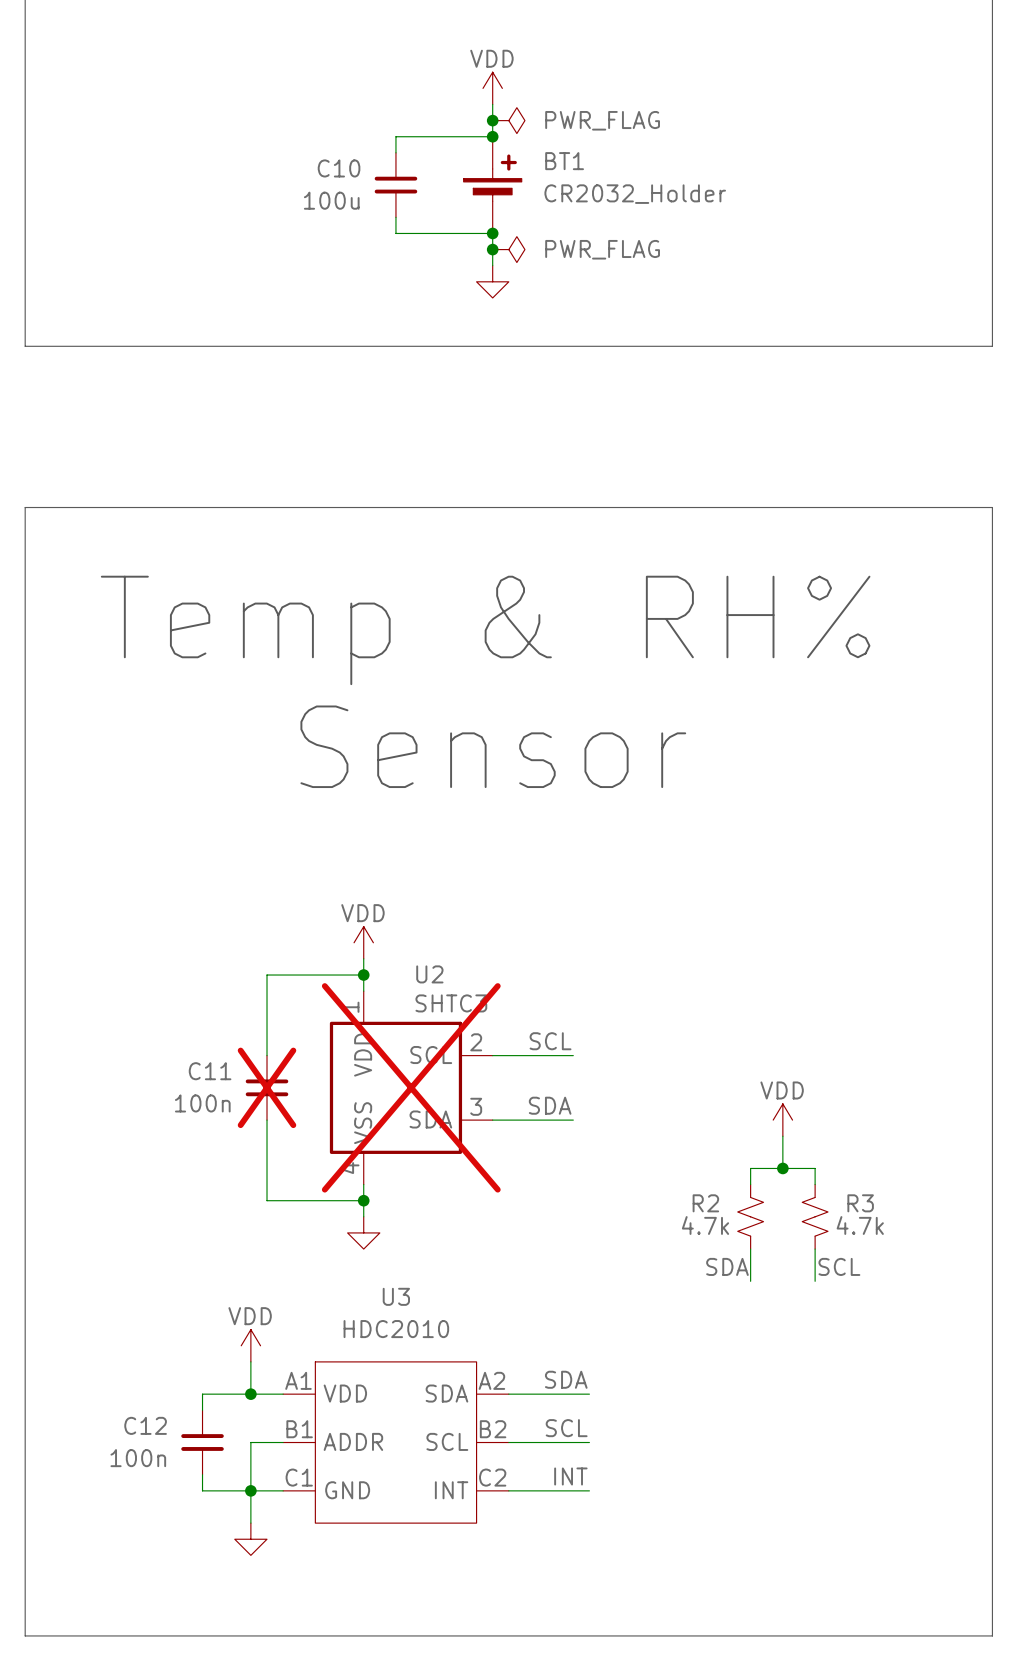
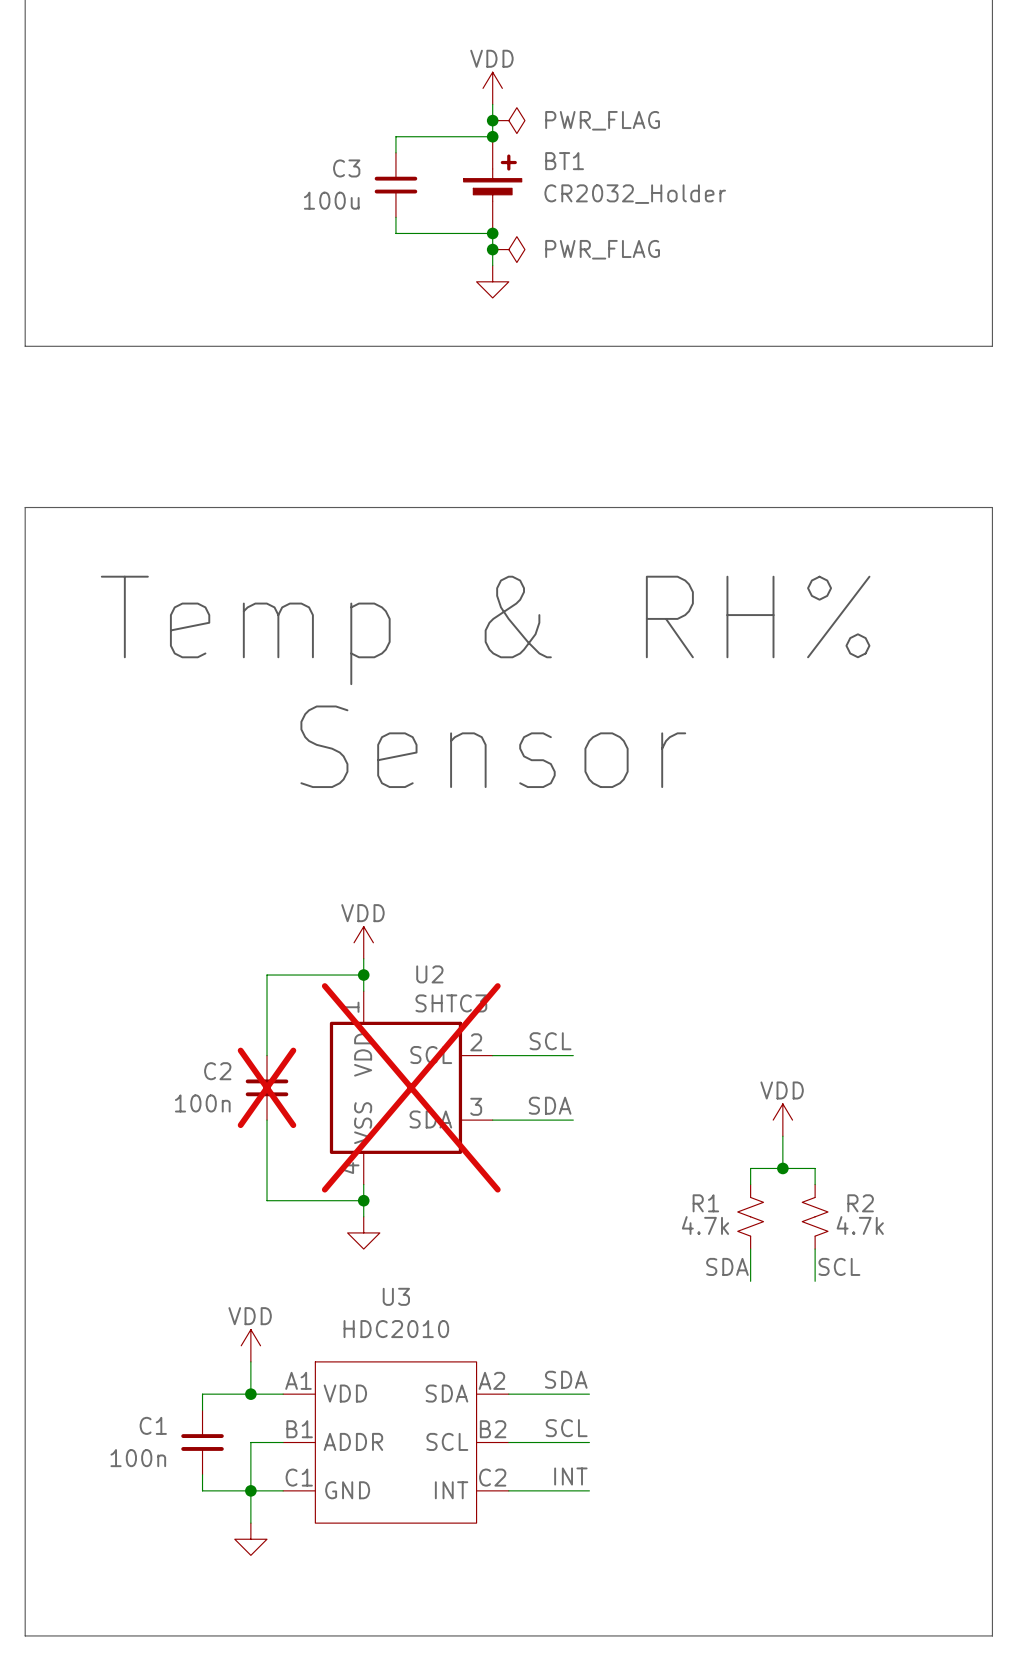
C10 name: C10 (339, 168) -> C3 (346, 168)
C11 name: C11 (210, 1071) -> C2 (217, 1071)
R2 name: R2 (705, 1203) -> R1 (705, 1203)
R3 name: R3 (860, 1203) -> R2 (860, 1203)
C12 name: C12 (145, 1425) -> C1 (153, 1425)

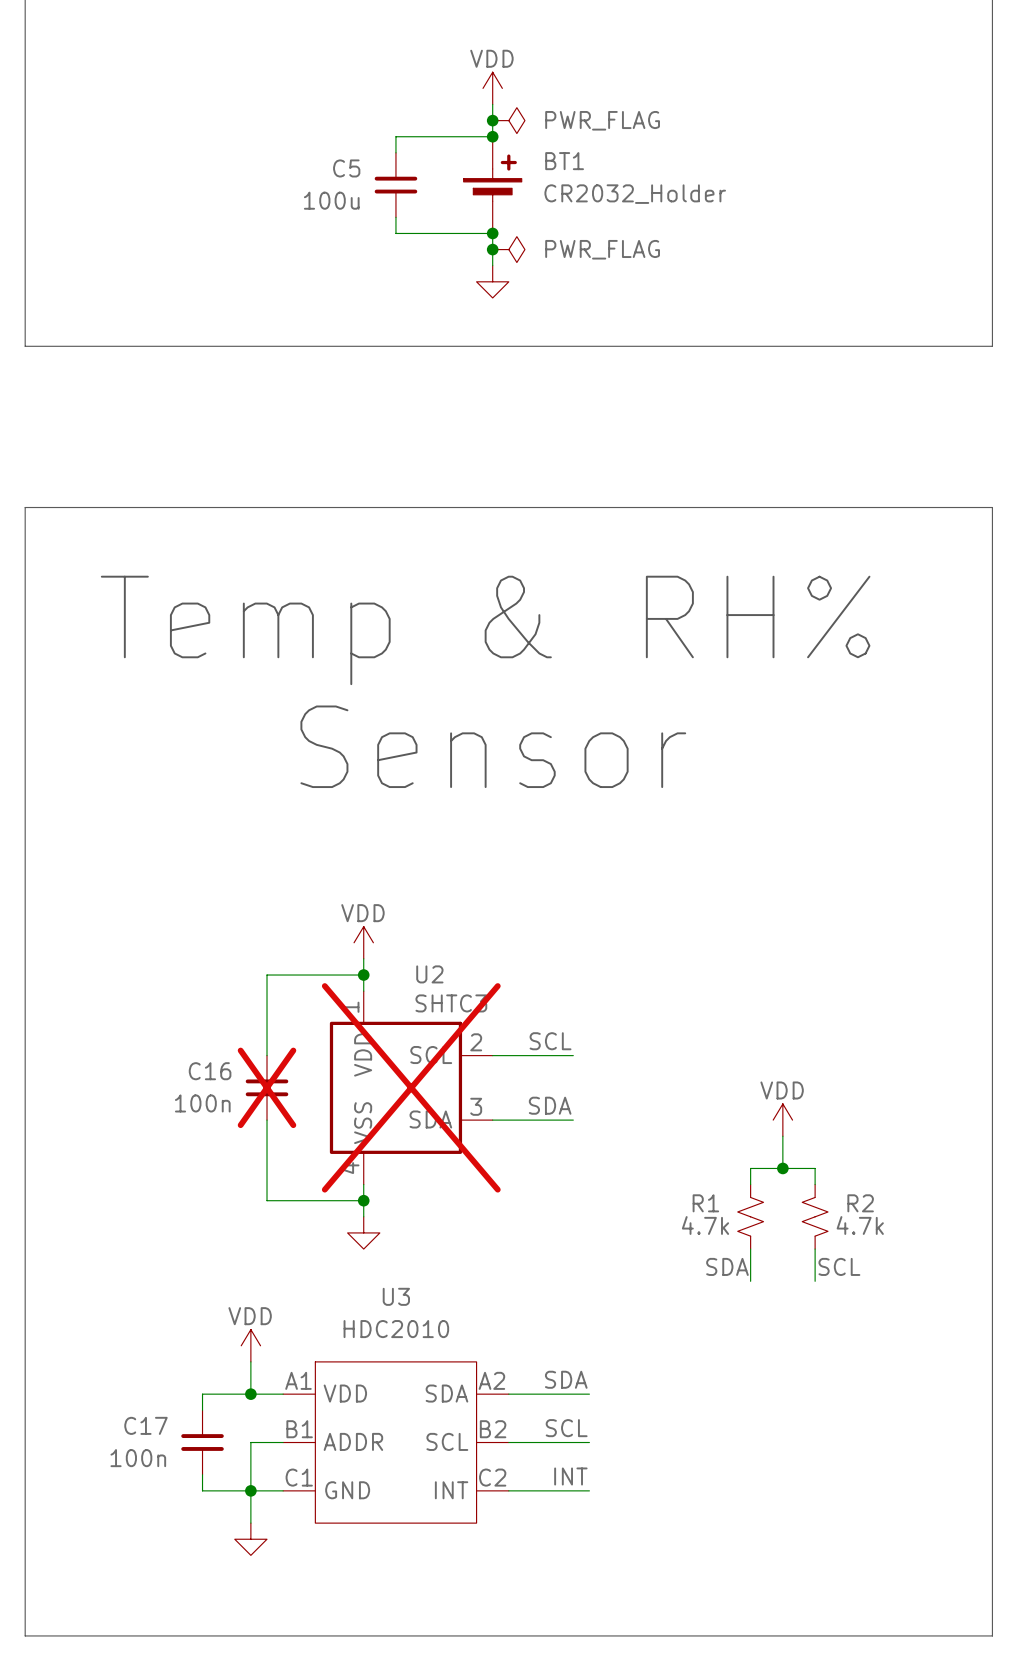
C3 name: C3 (346, 168) -> C5 (346, 168)
C2 name: C2 (217, 1071) -> C16 (210, 1071)
C1 name: C1 (153, 1425) -> C17 (145, 1425)

